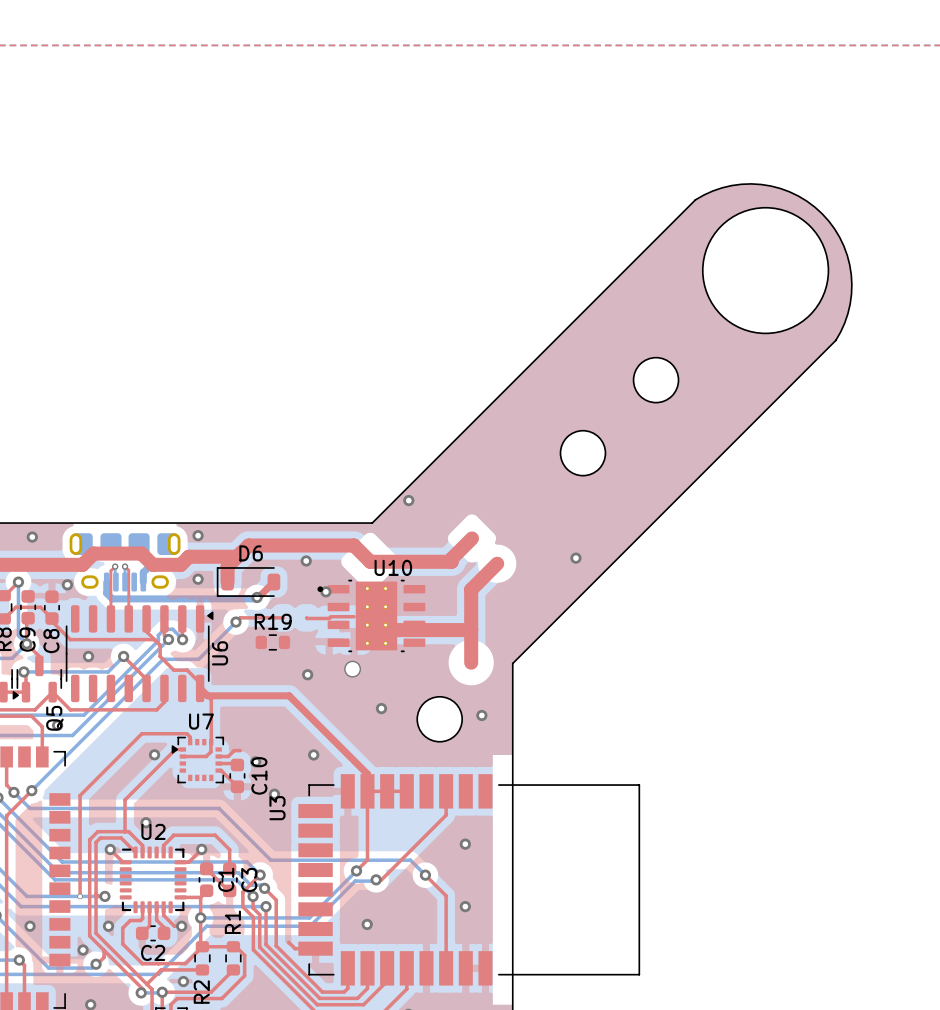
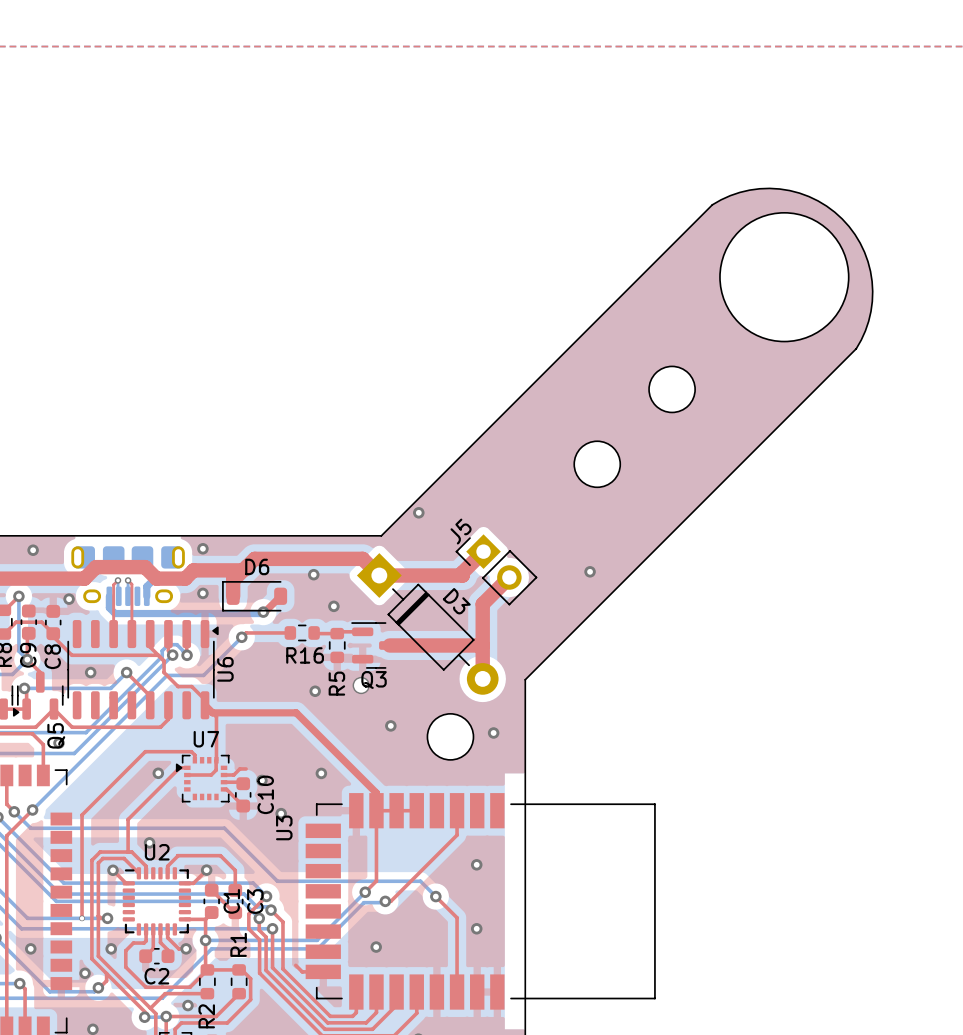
J5: none -> (496, 569)
D3: none -> (427, 623)
U10: (371, 615) -> none
R16: none -> (302, 632)
R5: none -> (337, 645)
Q3: none -> (375, 645)
R19: (272, 642) -> none

